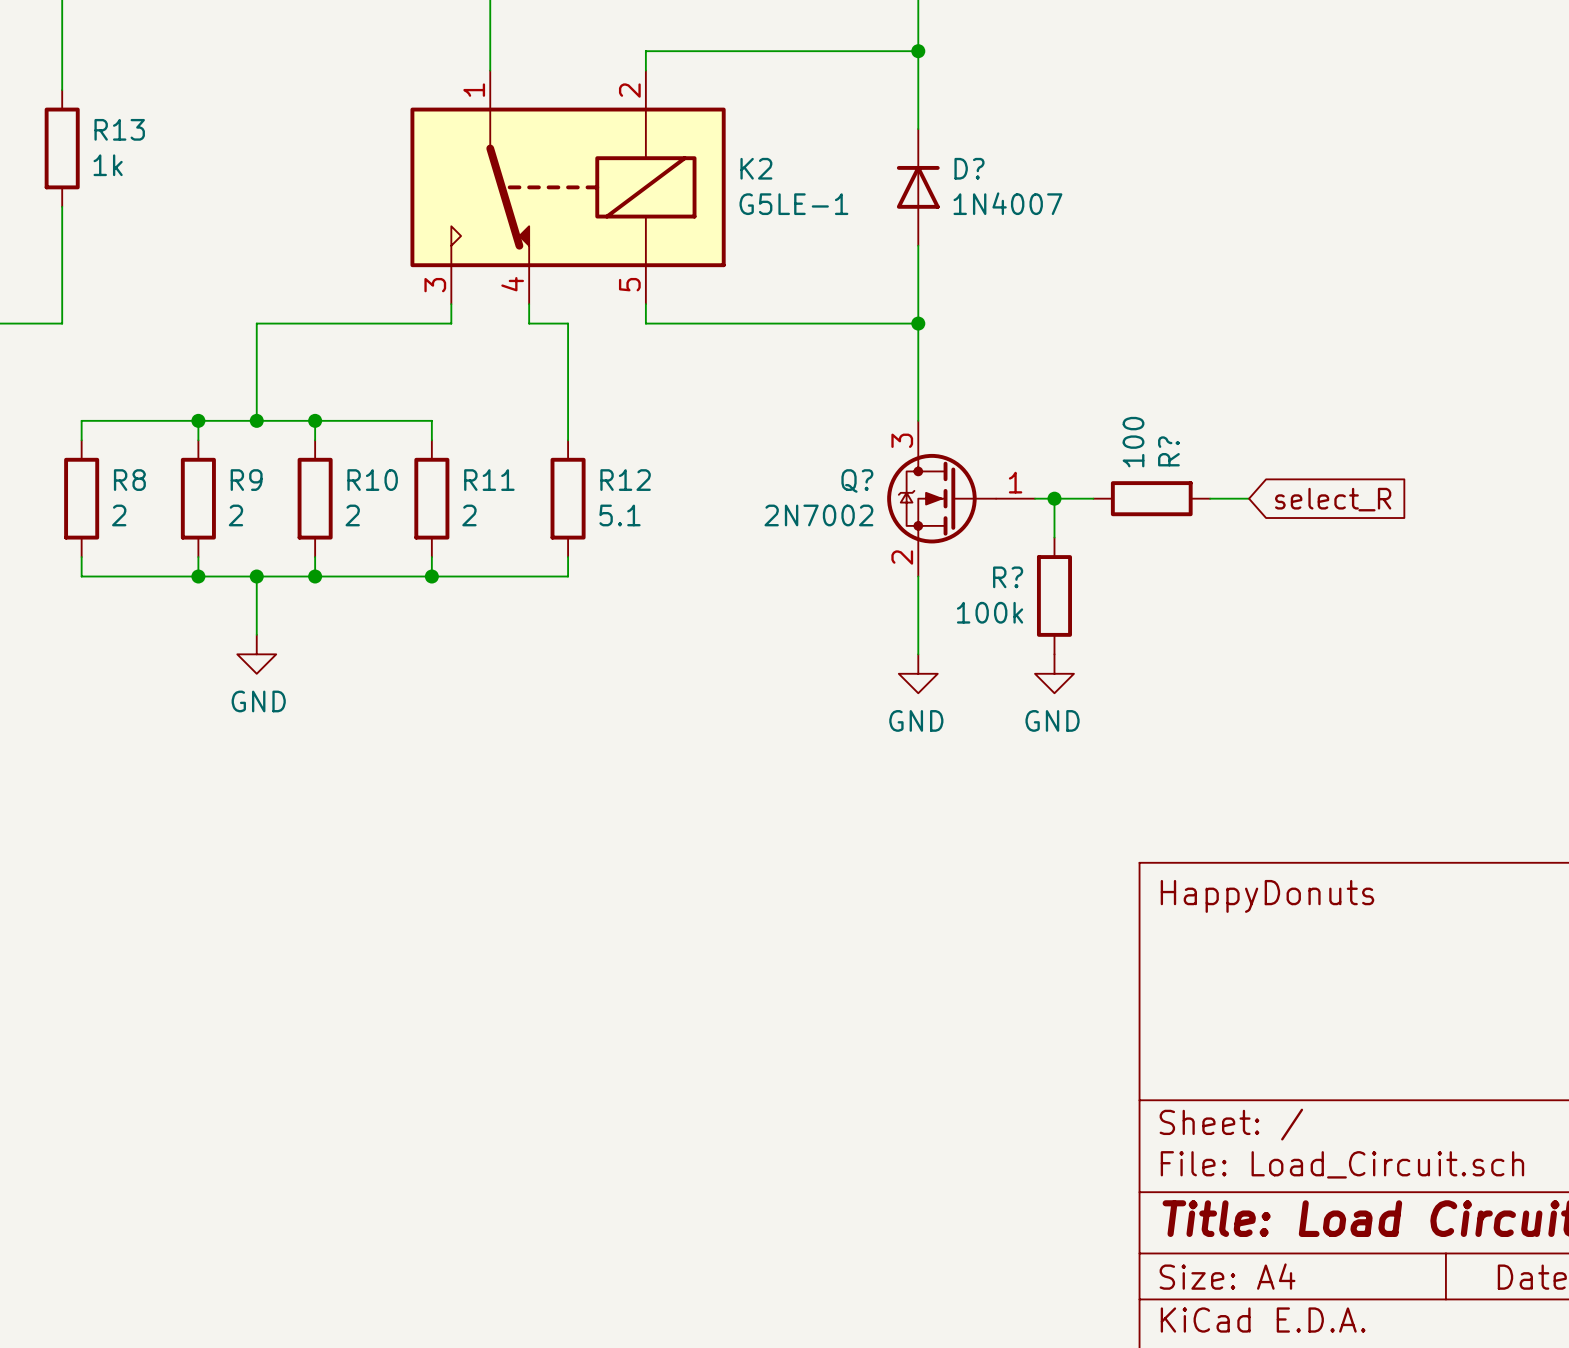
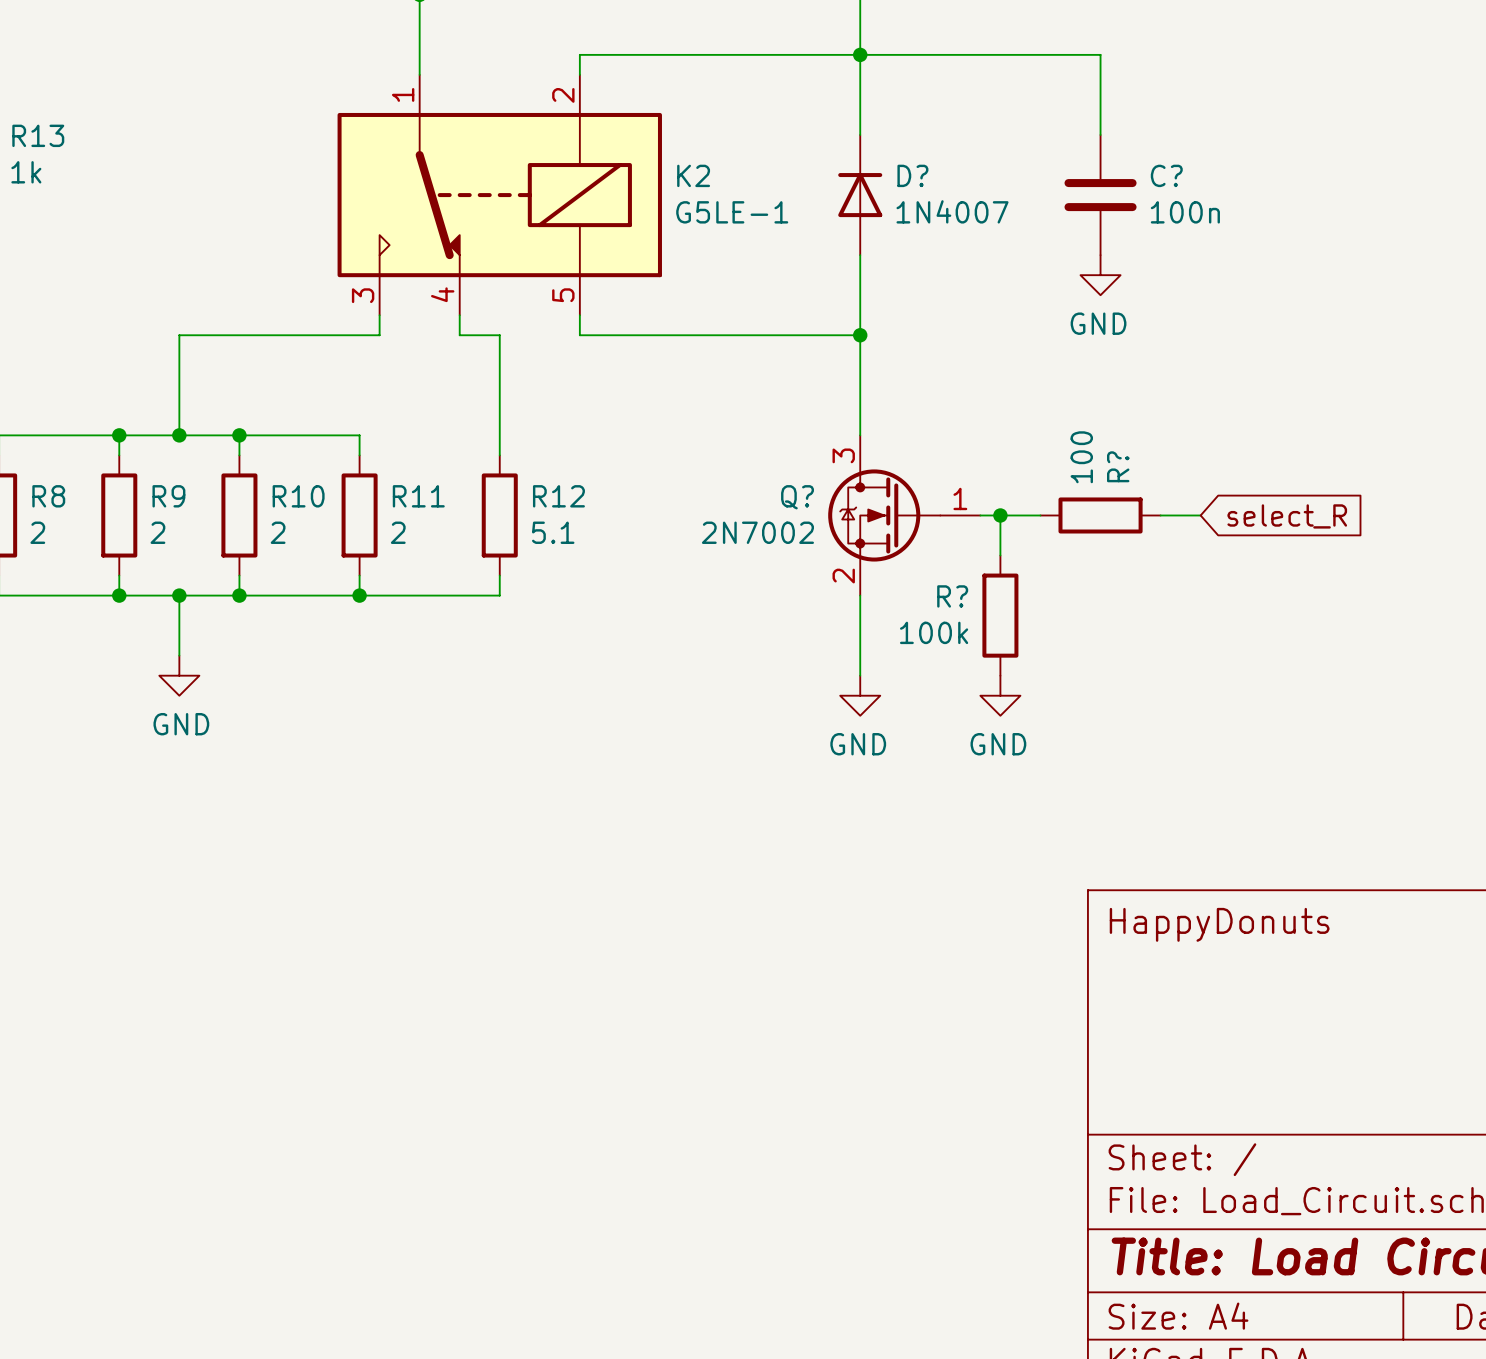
wire: none -> (860, 54) (1100, 54) (1100, 134)
C?: none -> 100n (1100, 195)
power symbol: none -> GND (1100, 275)

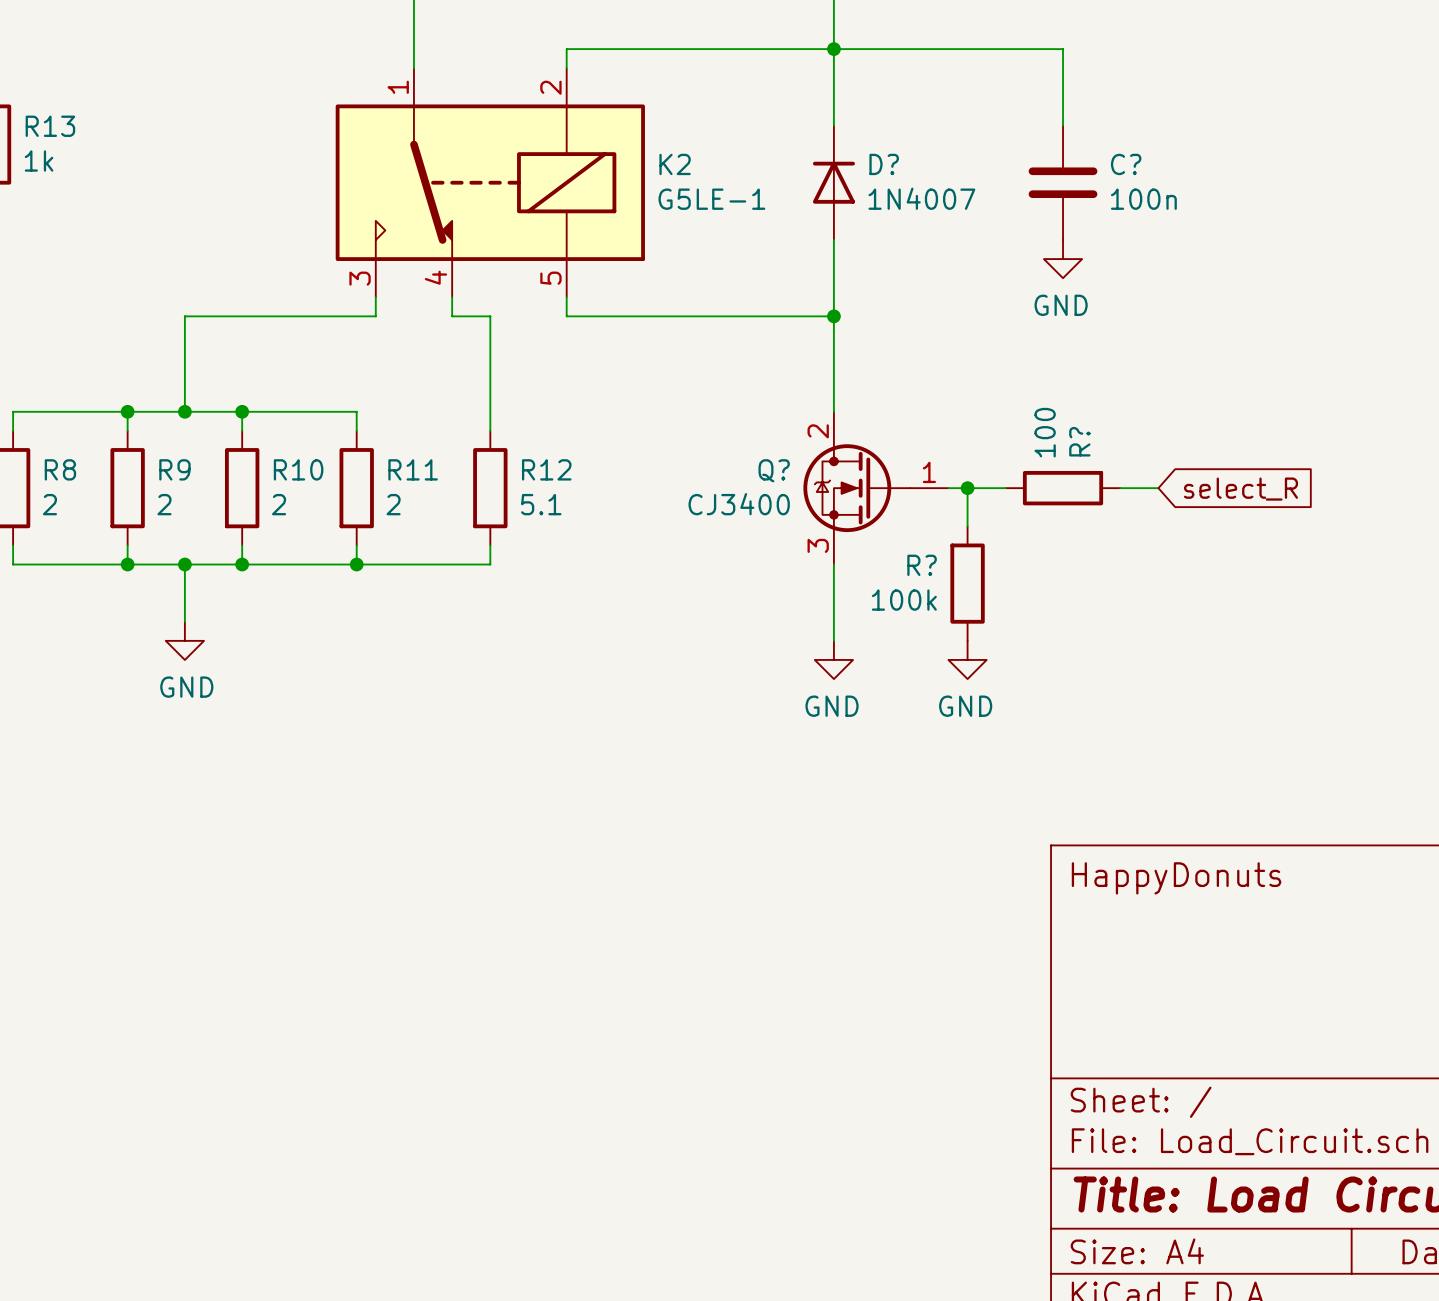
Q? pin number: 3 (843, 455) -> 2 (818, 431)
Q? value: 2N7002 (757, 532) -> CJ3400 (739, 504)
Q? pin number: 2 (843, 576) -> 3 (818, 545)

